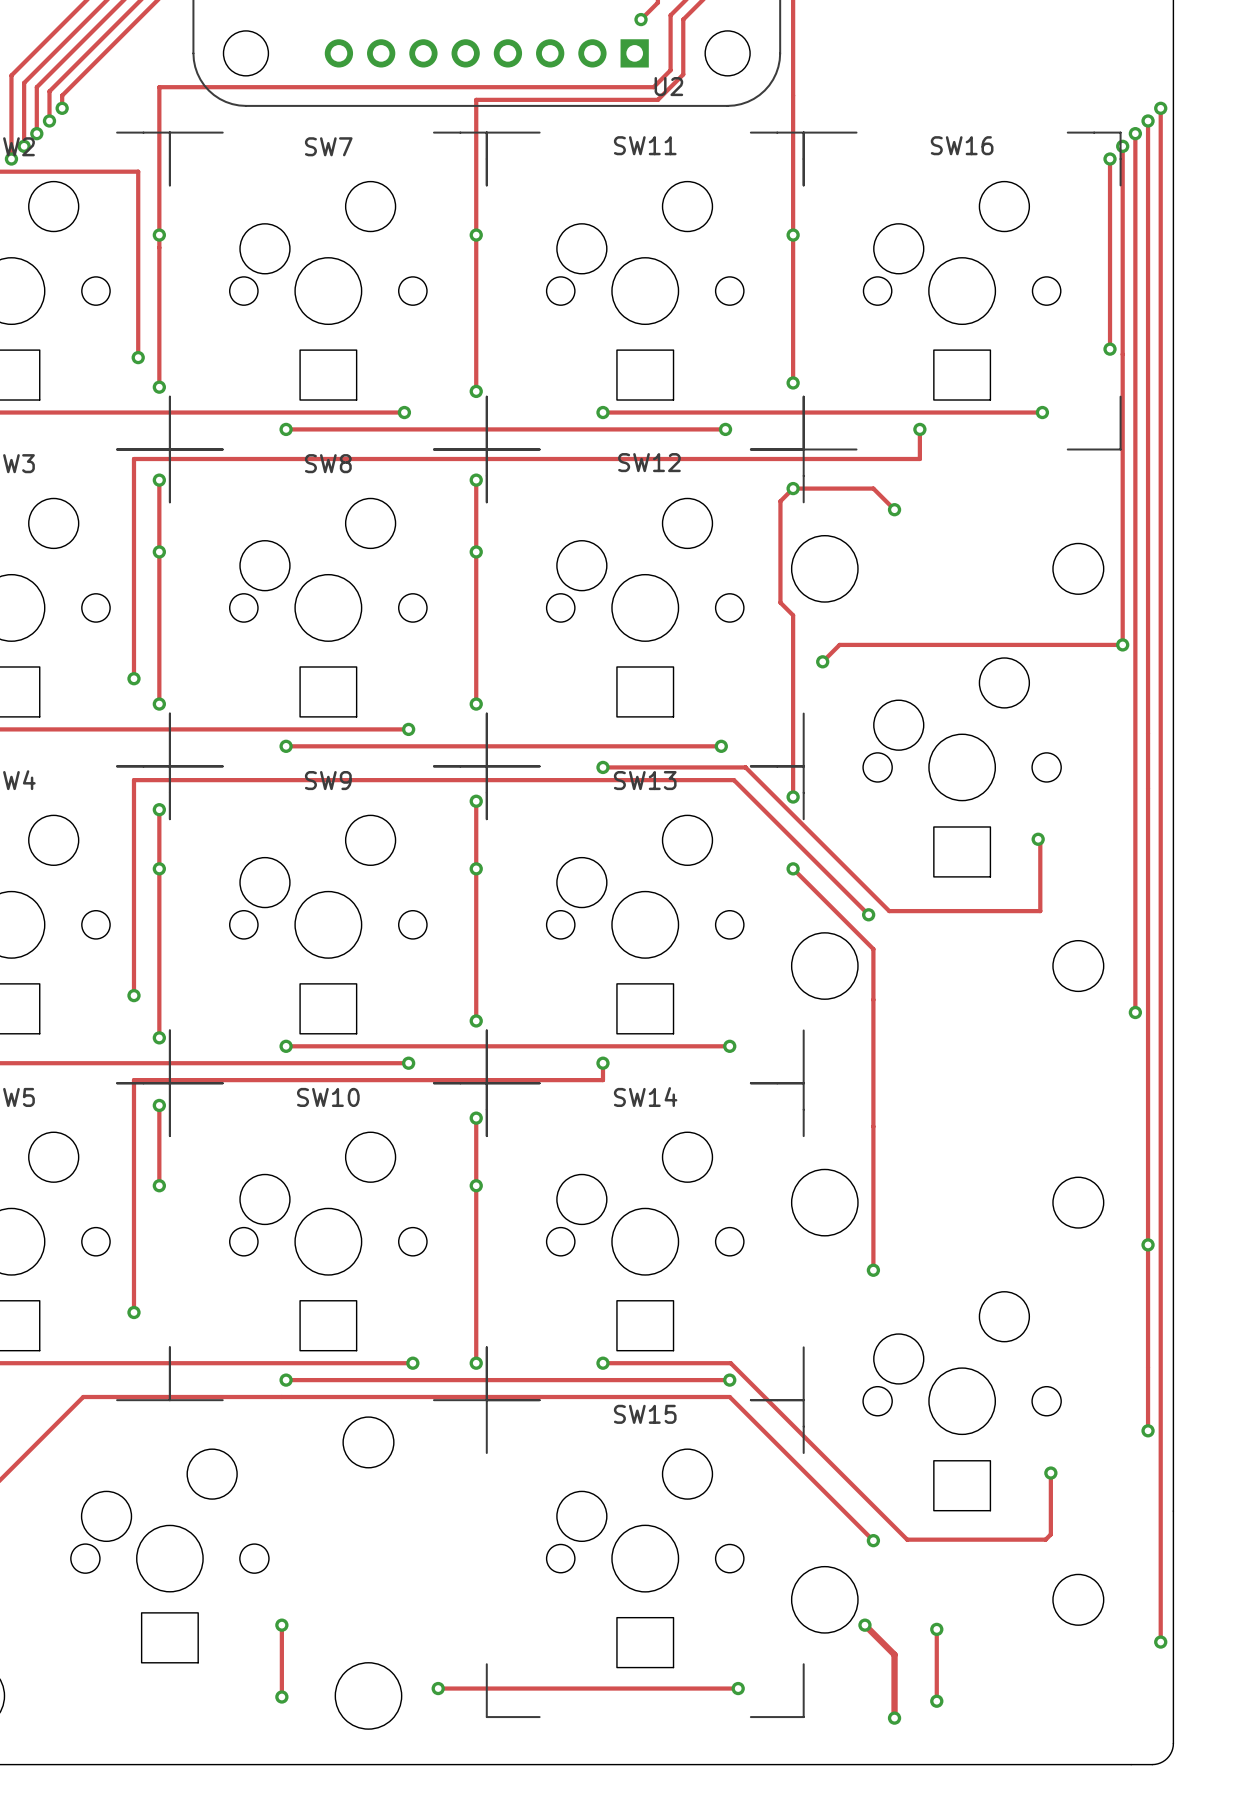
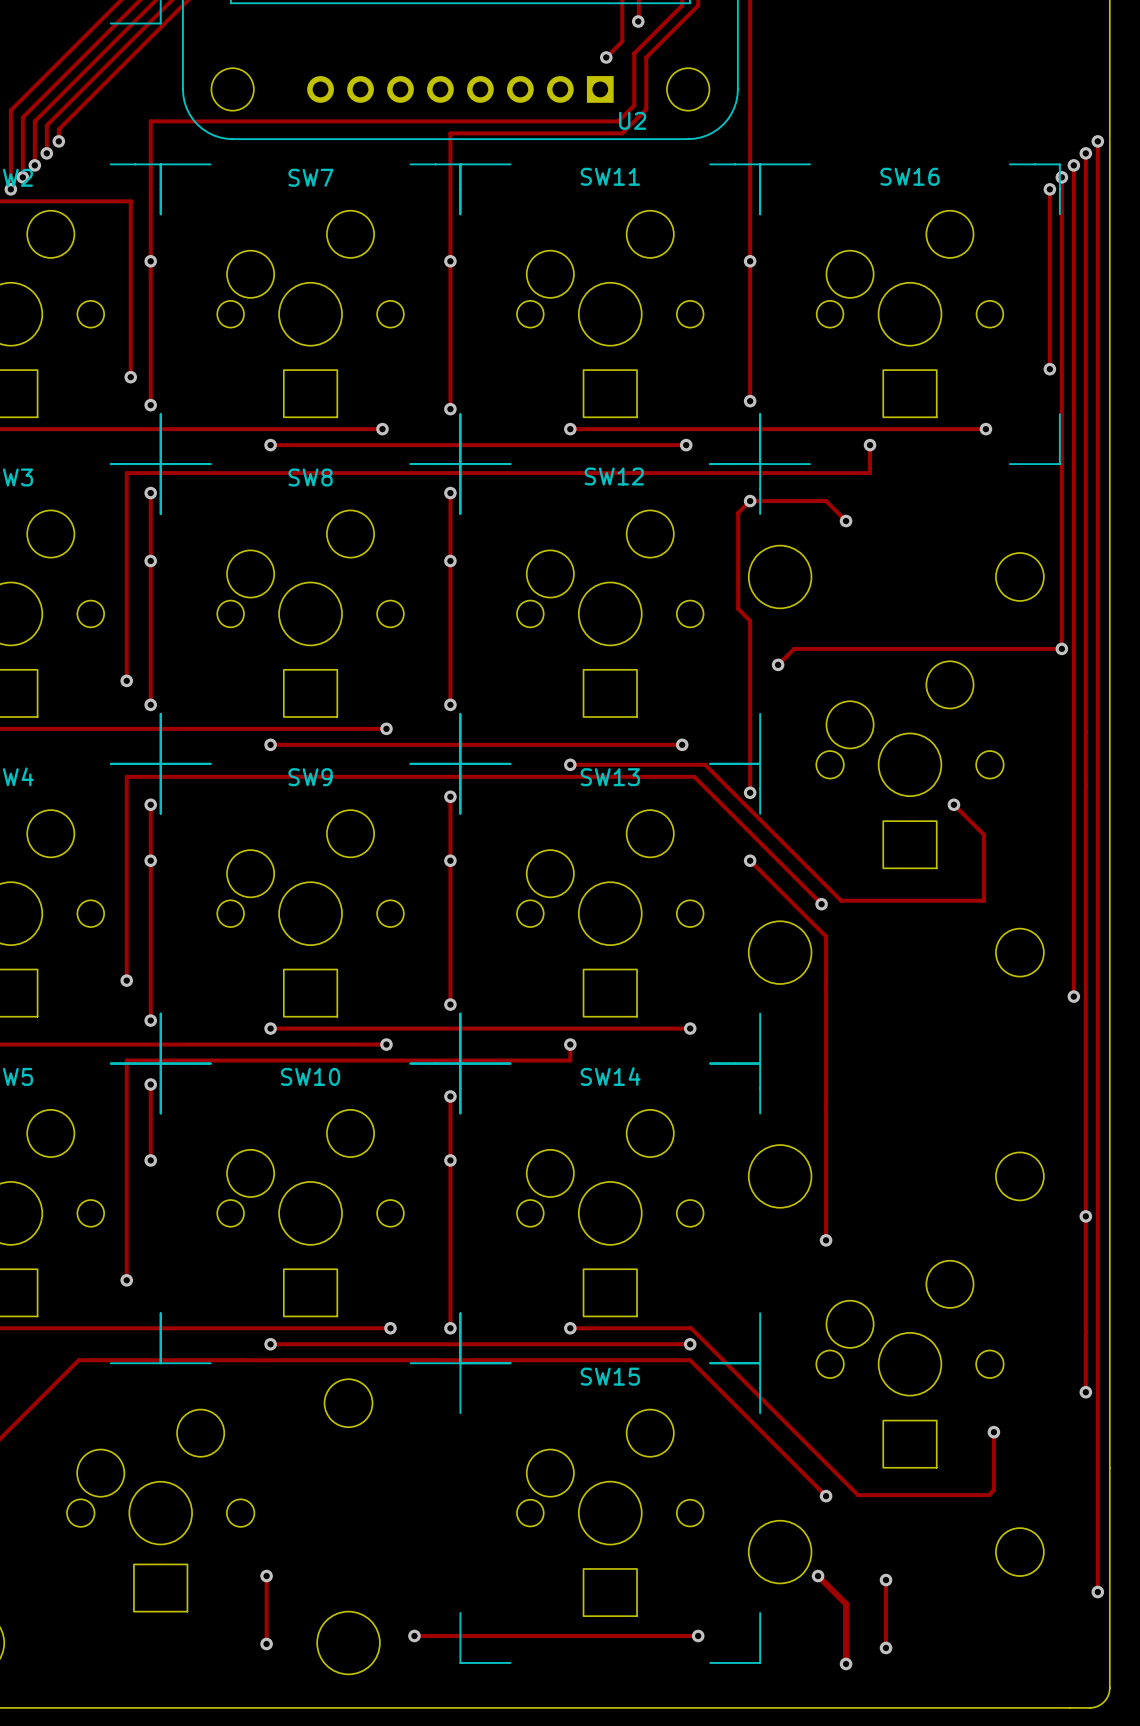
track: none -> (953, 804) (981, 832)
via position: (1038, 839) -> (953, 804)

